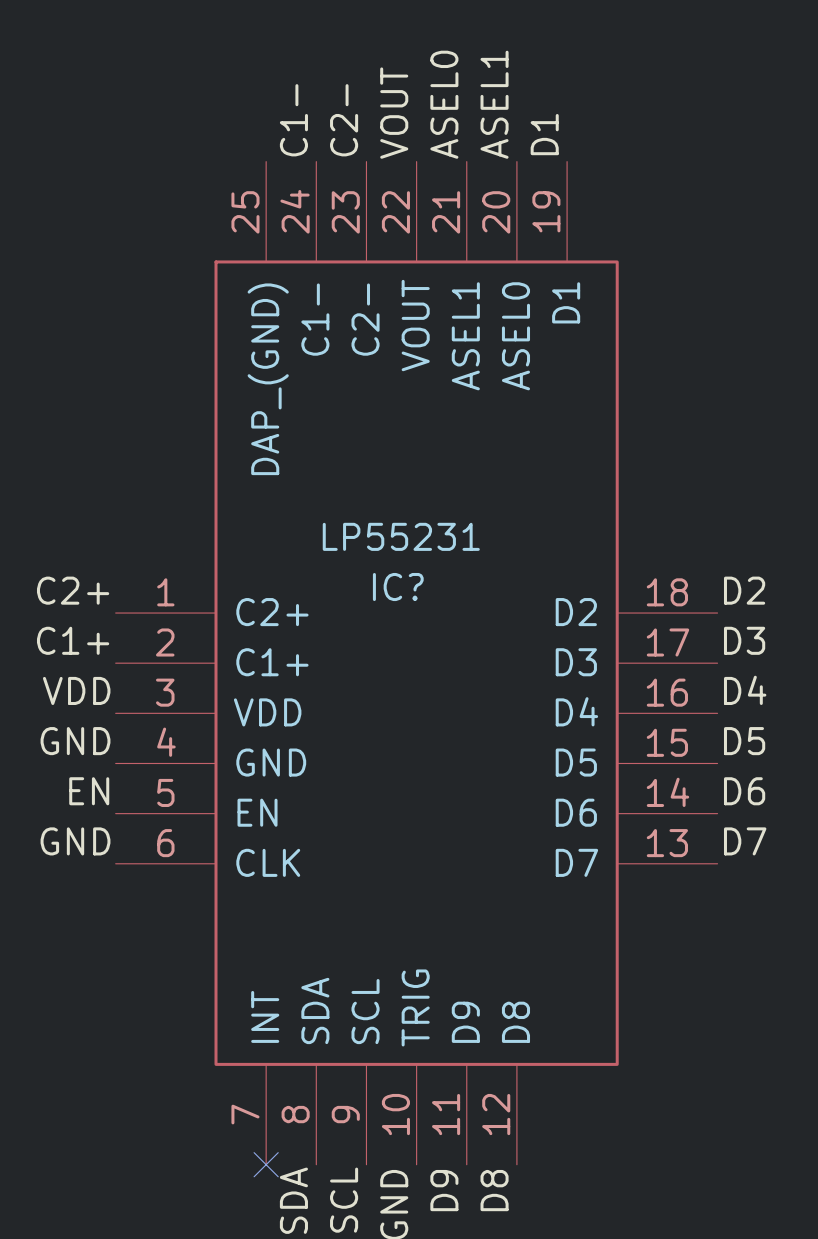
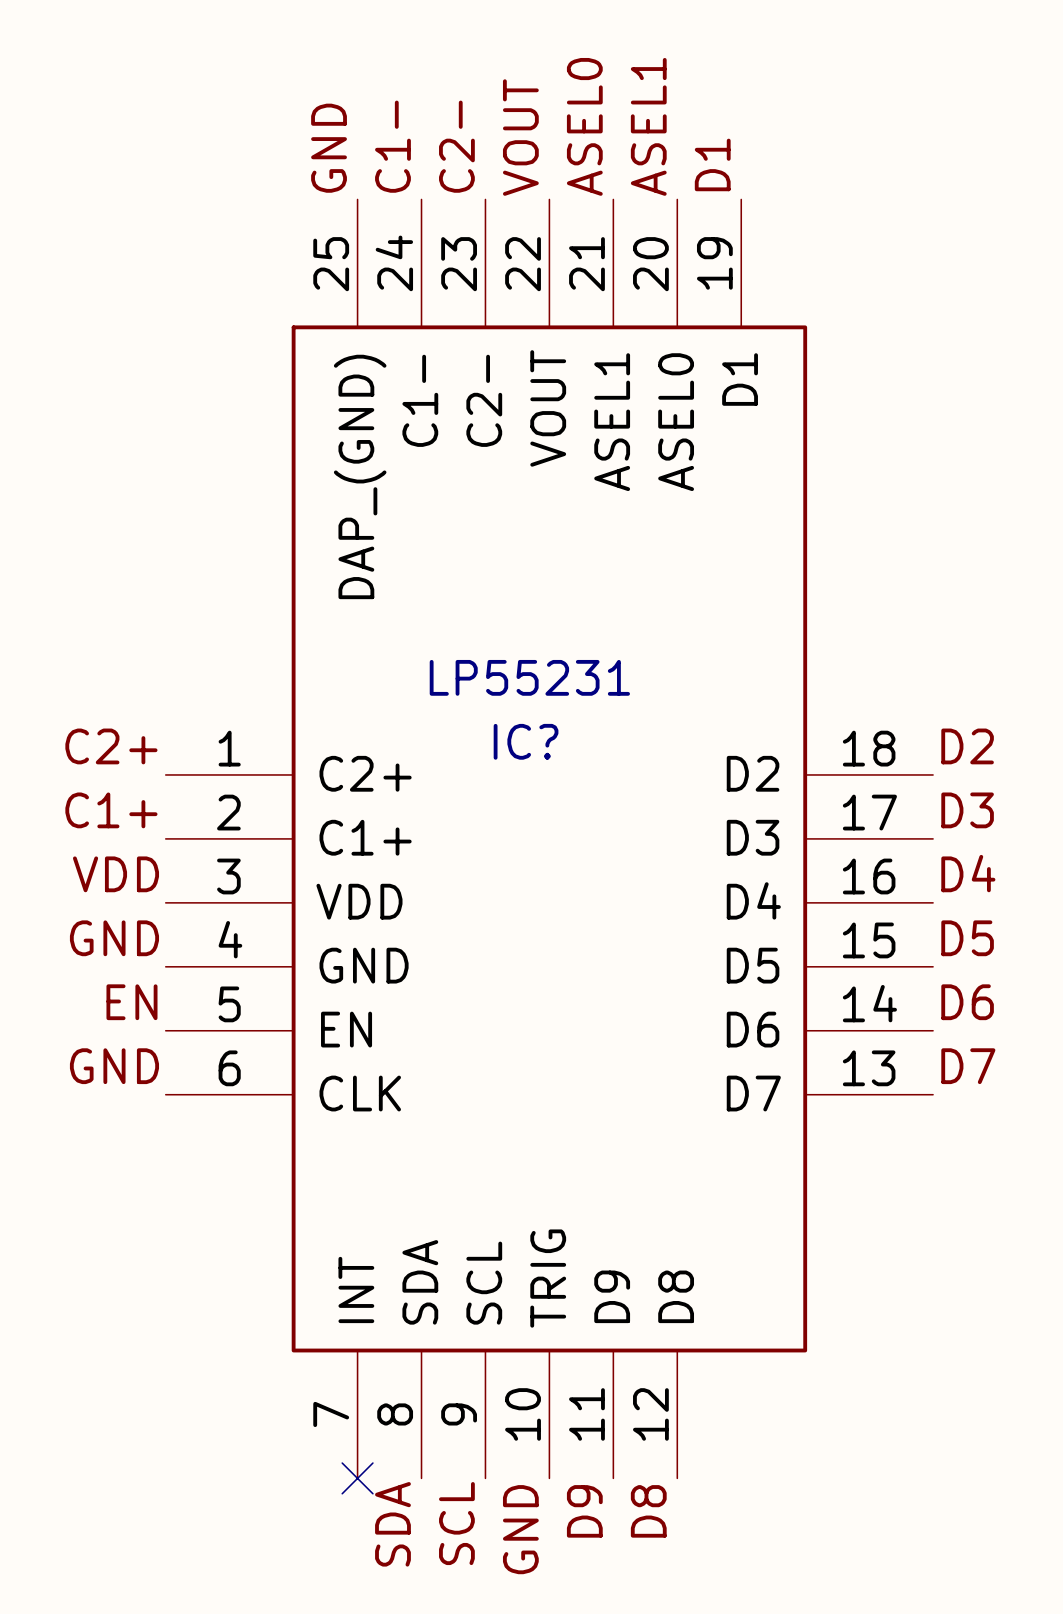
label: none -> GND (329, 148)

